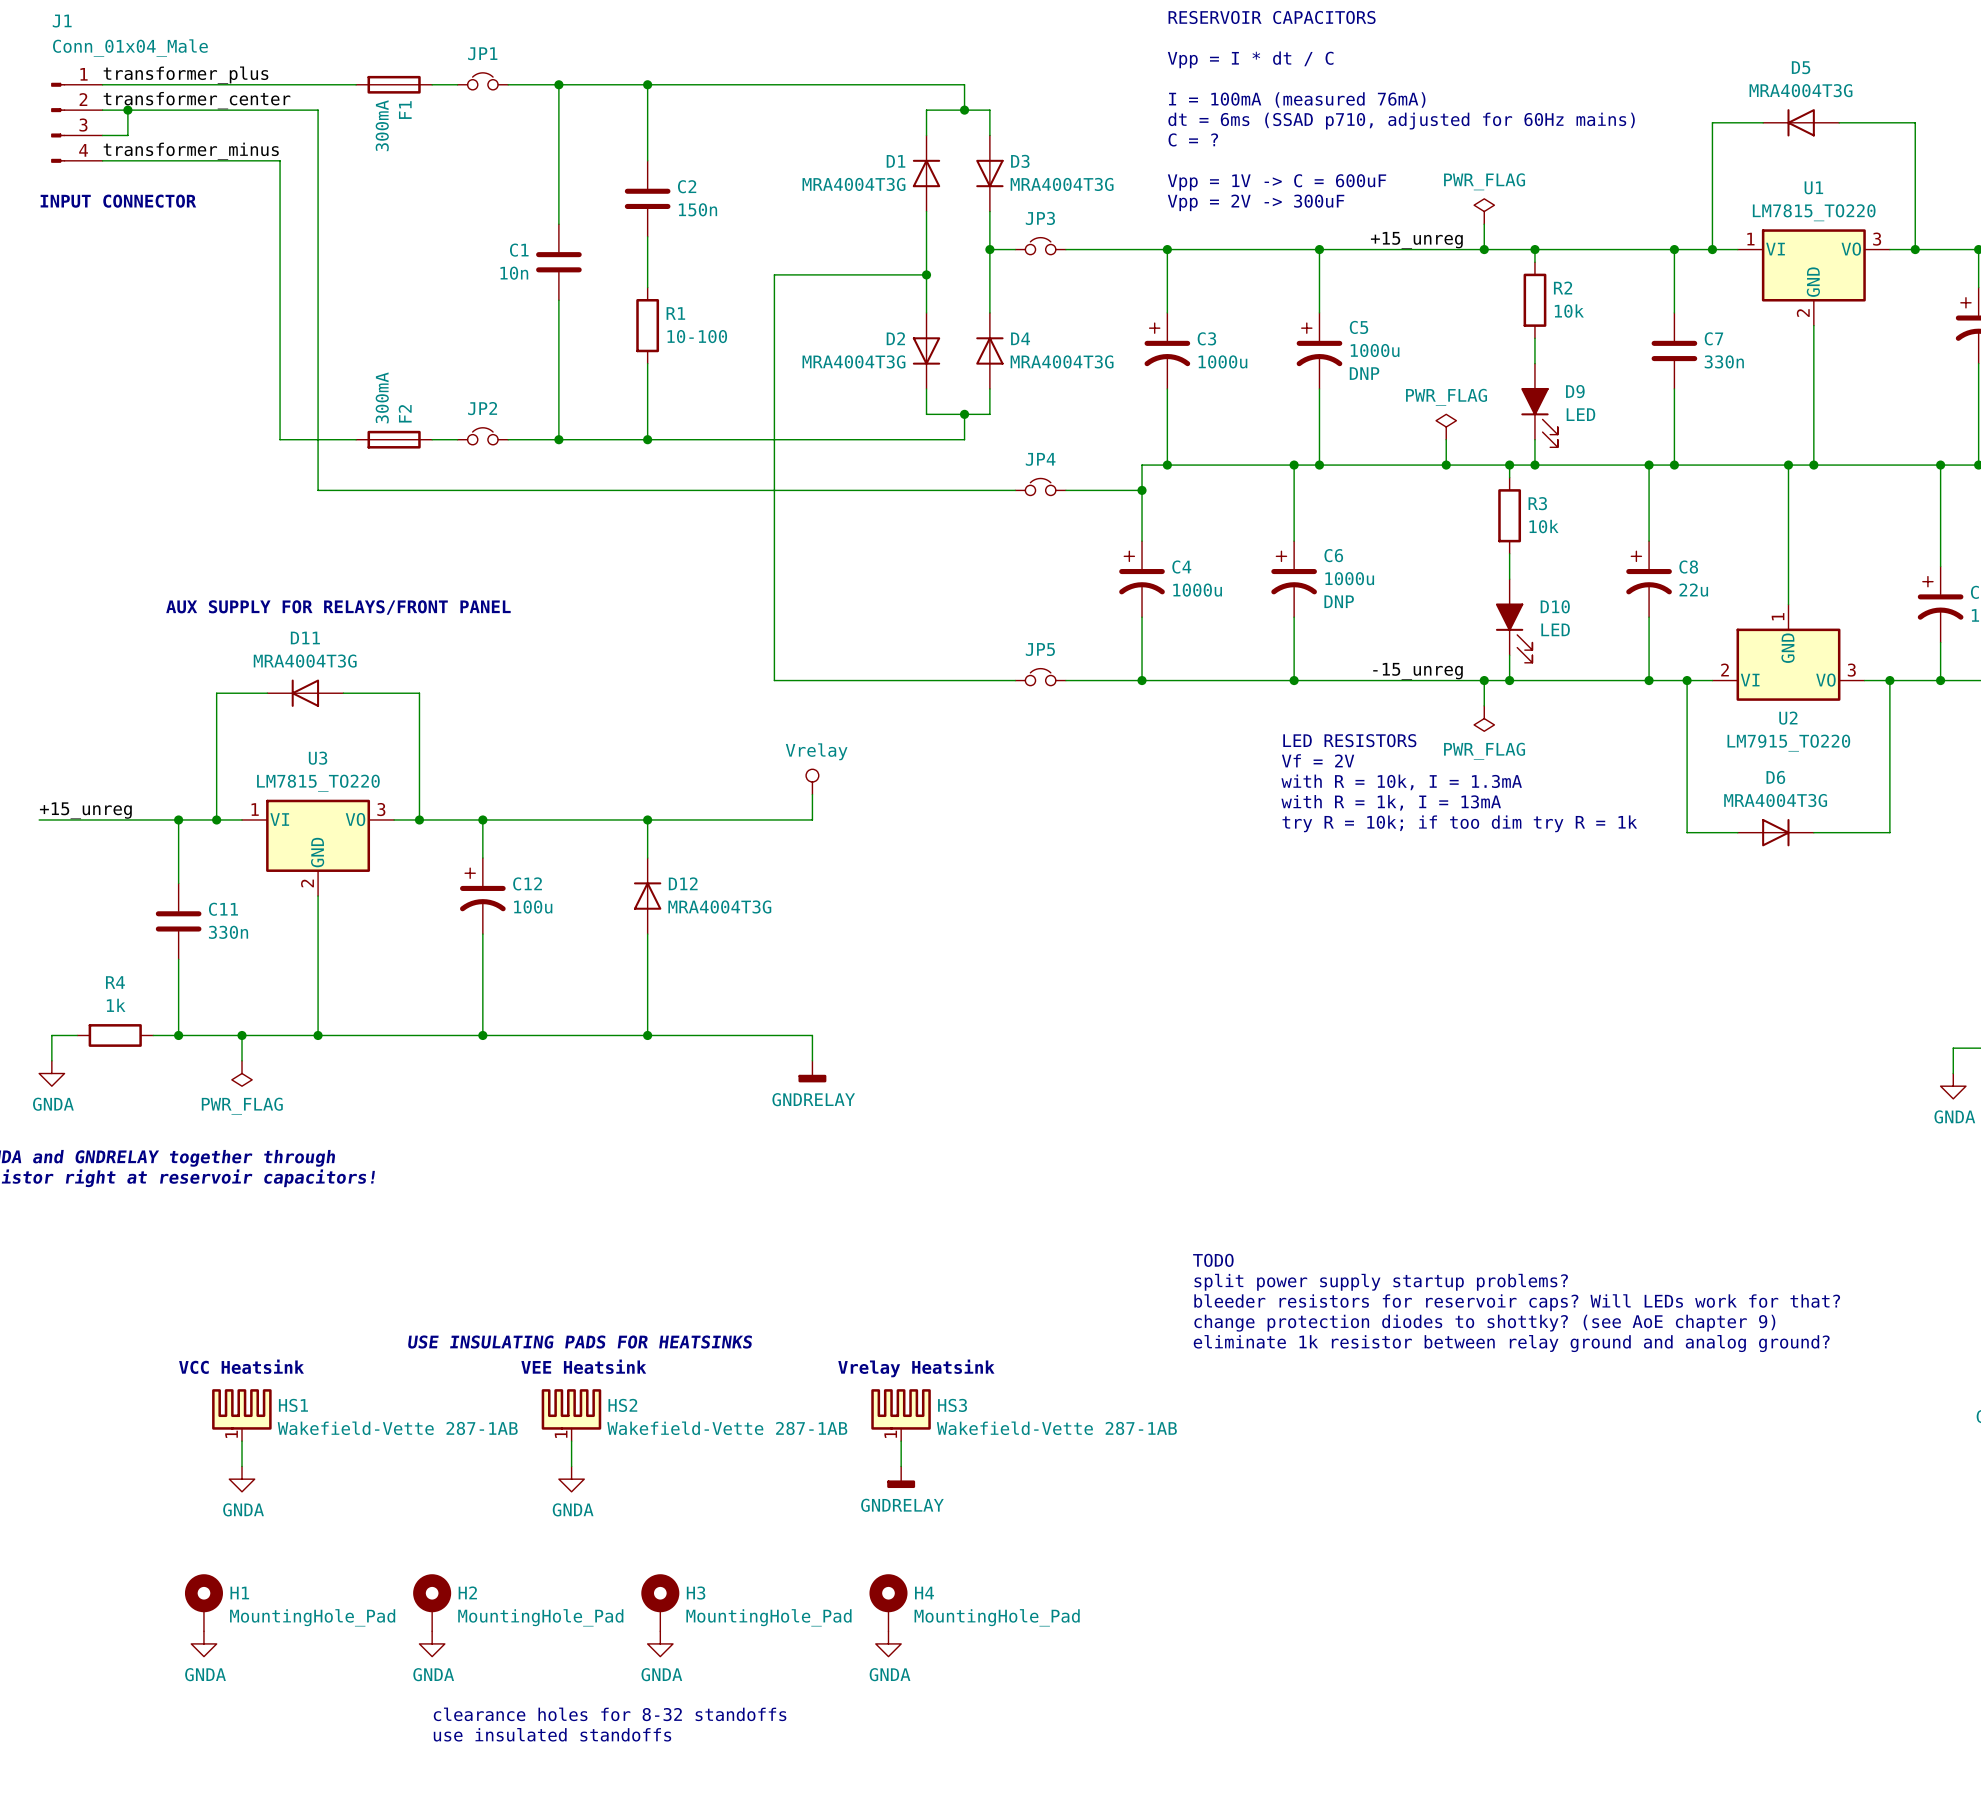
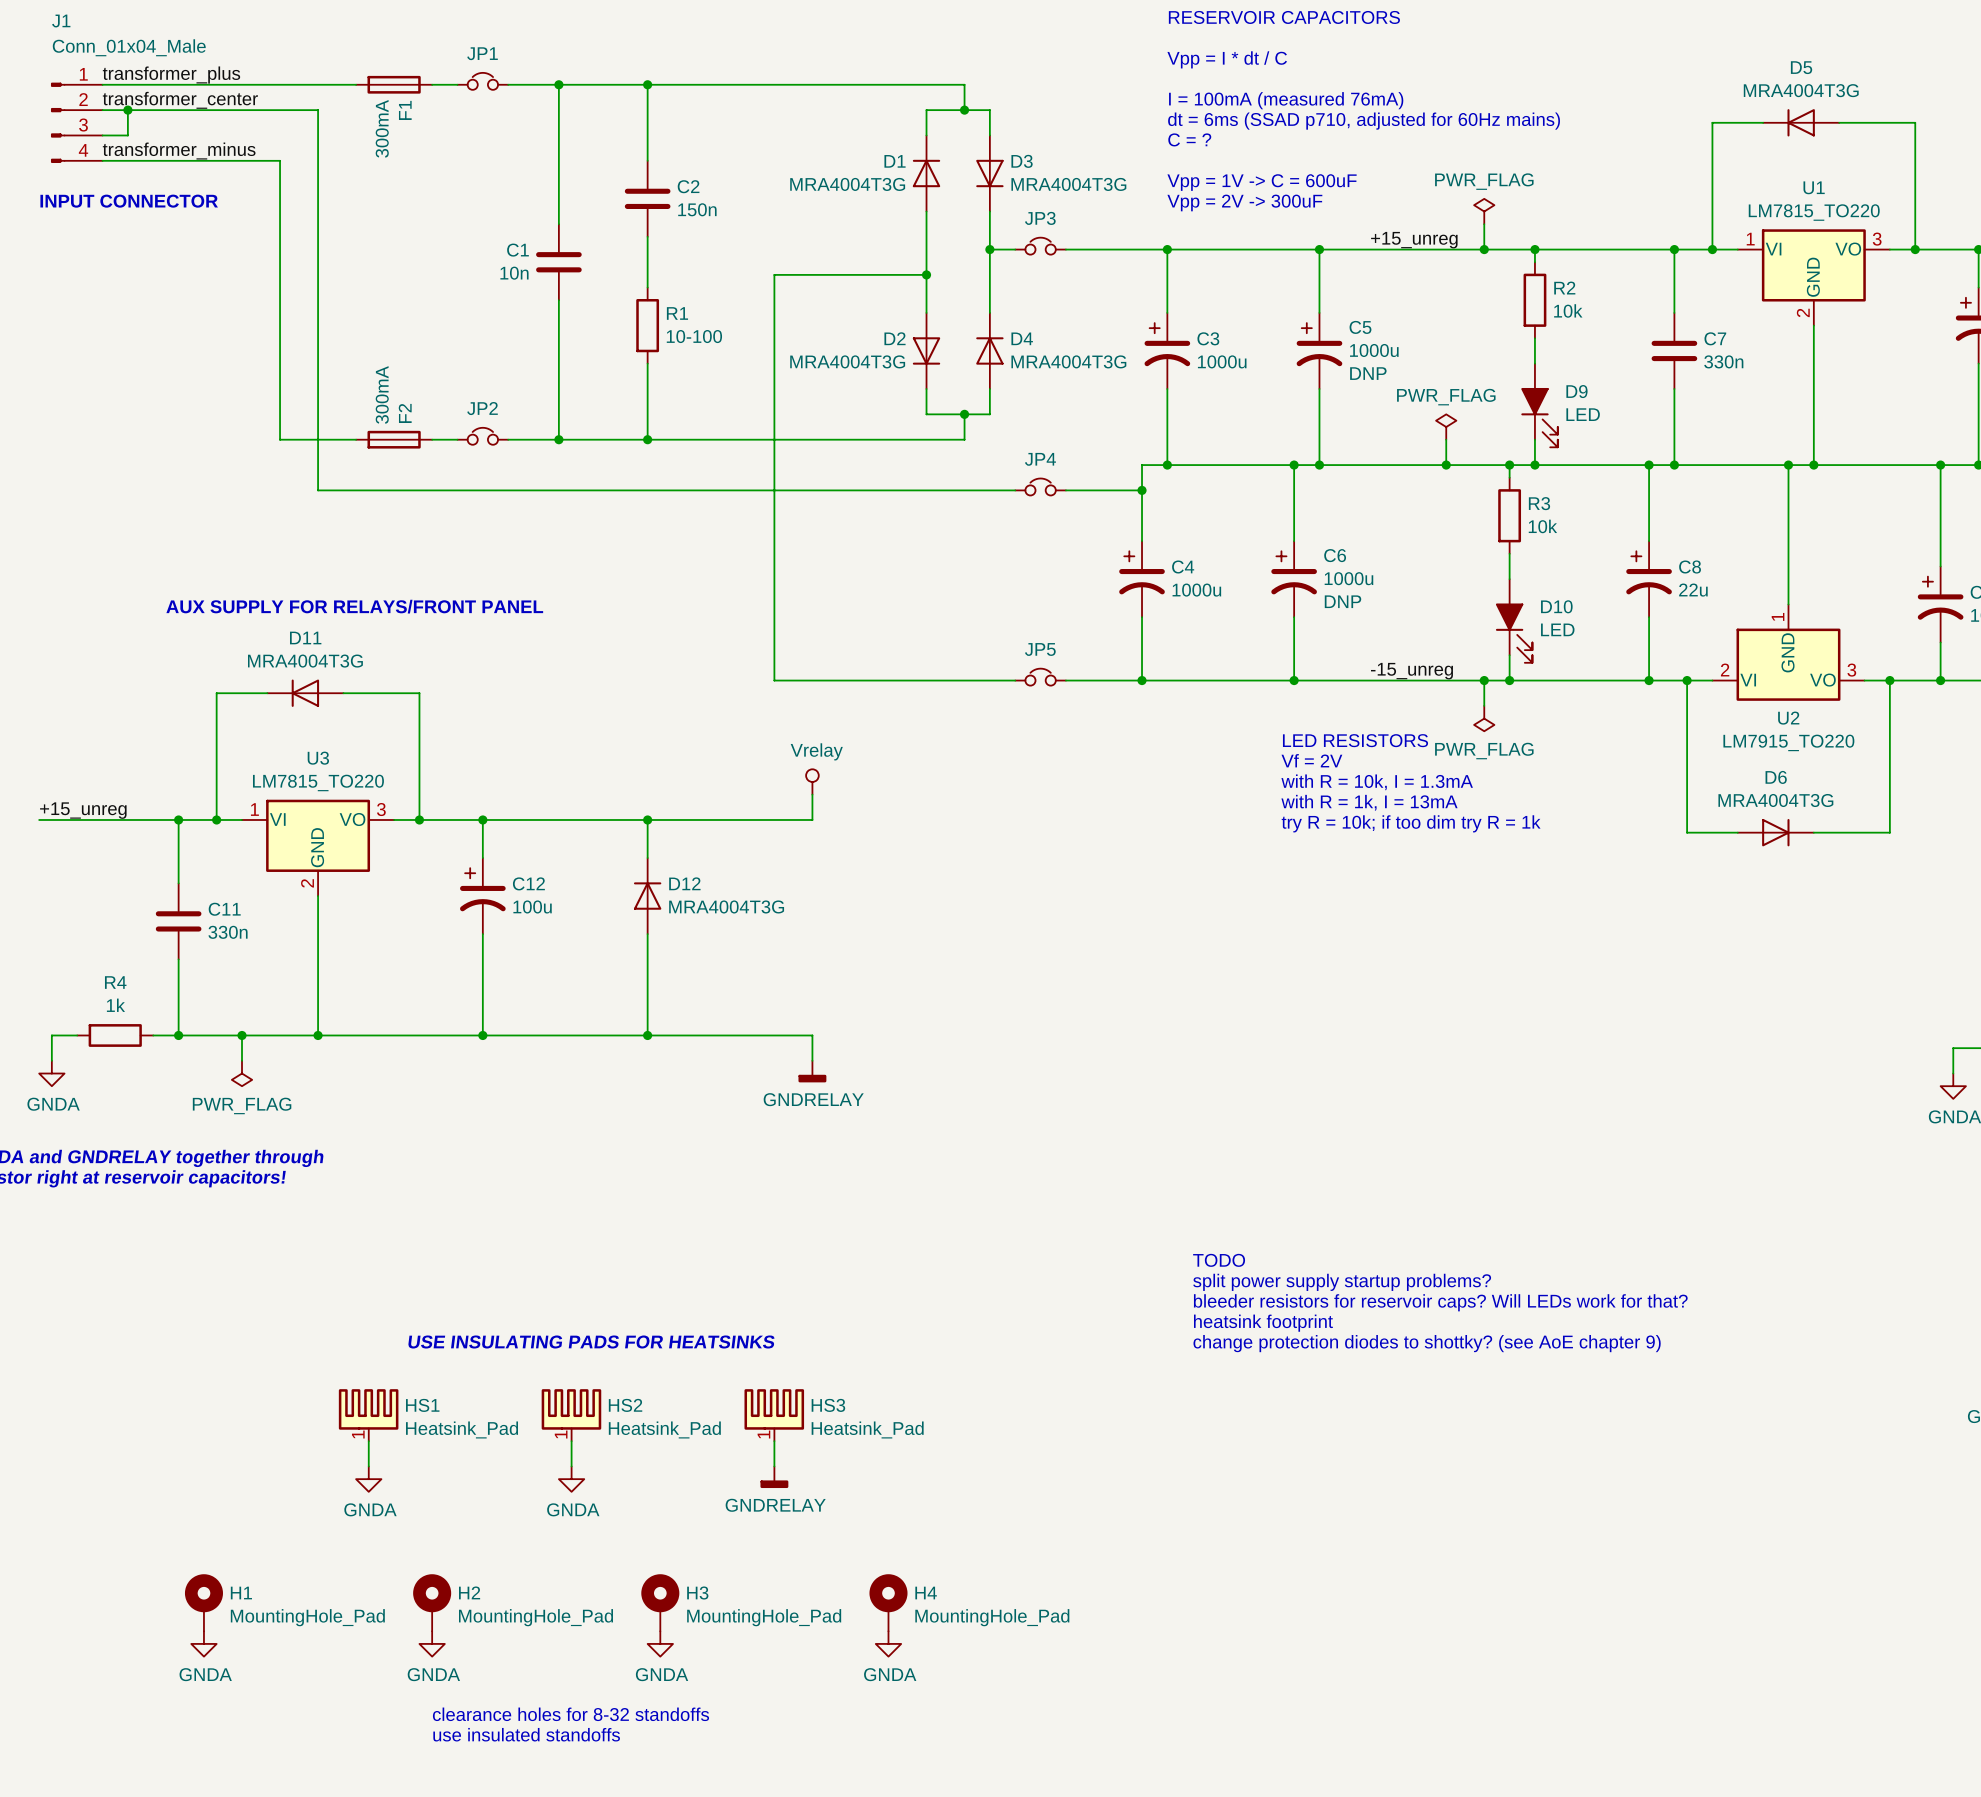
text: change protection diodes to shottky? (see AoE chapter 9) (1484, 1323) -> heatsink footprint (1263, 1323)
text: eliminate 1k resistor between relay ground and analog ground? (1511, 1343) -> change protection diodes to shottky? (see AoE chapter 9) (1427, 1343)
text: VCC Heatsink (241, 1366) -> none
text: VEE Heatsink (583, 1366) -> none
text: Vrelay Heatsink (916, 1368) -> none
HS1 position: (241, 1415) -> (368, 1415)
HS3 position: (901, 1415) -> (774, 1415)
HS1 value: Wakefield-Vette 287-1AB (397, 1428) -> Heatsink_Pad (462, 1429)
HS2 value: Wakefield-Vette 287-1AB (727, 1428) -> Heatsink_Pad (664, 1429)
HS3 value: Wakefield-Vette 287-1AB (1056, 1428) -> Heatsink_Pad (867, 1429)
wire: (242, 1441) (242, 1466) -> (368, 1441) (368, 1466)
wire: (901, 1441) (901, 1466) -> (774, 1441) (774, 1466)
power symbol position: GNDRELAY (901, 1477) -> GNDRELAY (774, 1477)
power symbol position: GNDA (242, 1479) -> GNDA (368, 1479)

